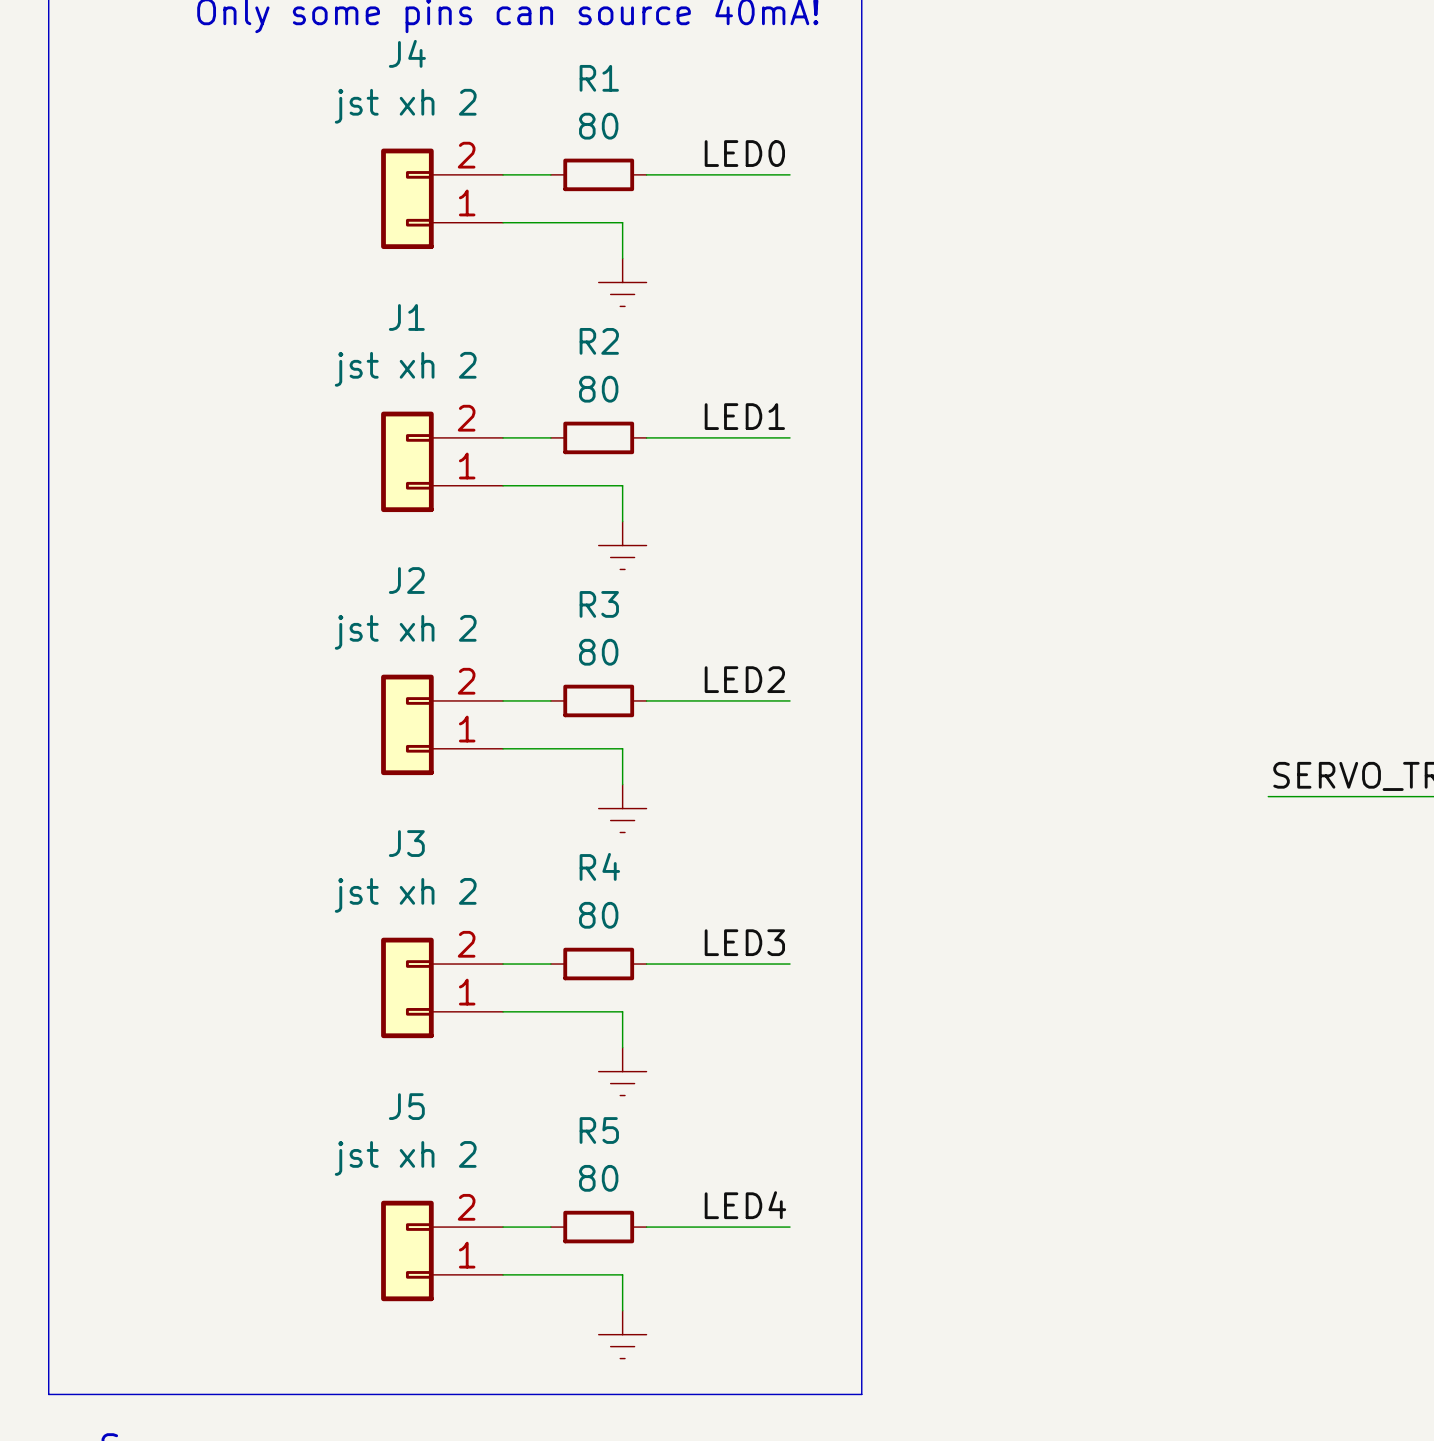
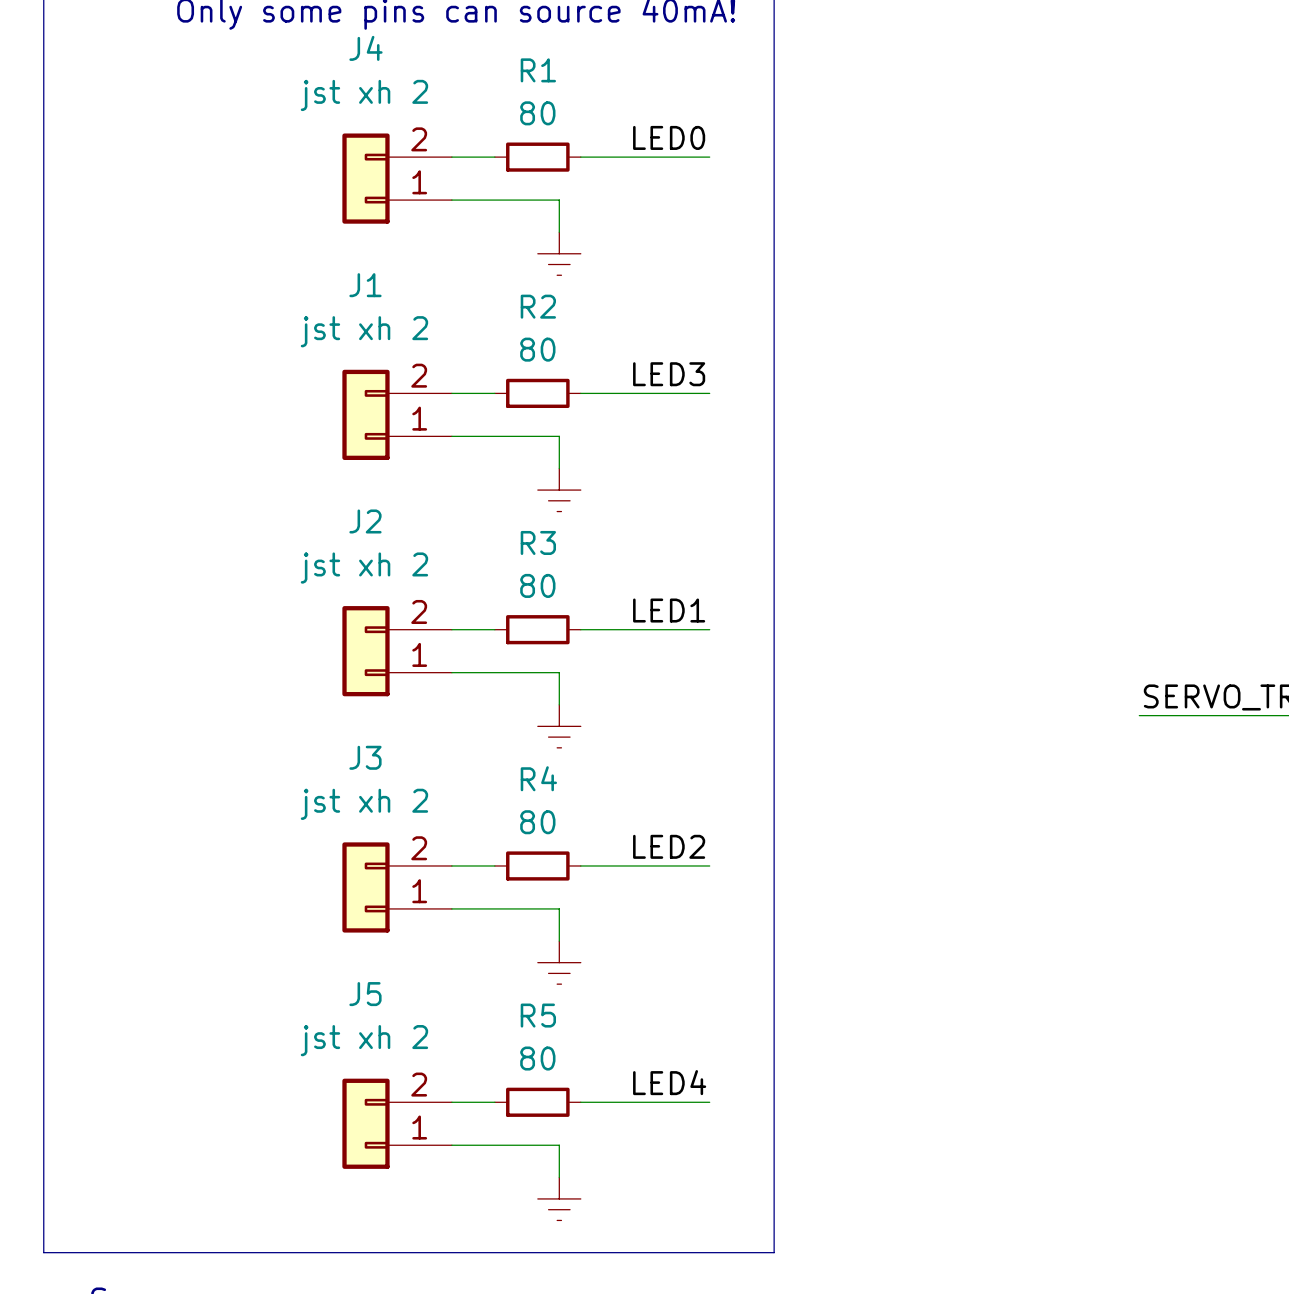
label: LED1 (744, 416) -> LED3 (669, 374)
label: LED2 (744, 679) -> LED1 (669, 610)
label: LED3 (744, 942) -> LED2 (669, 846)

